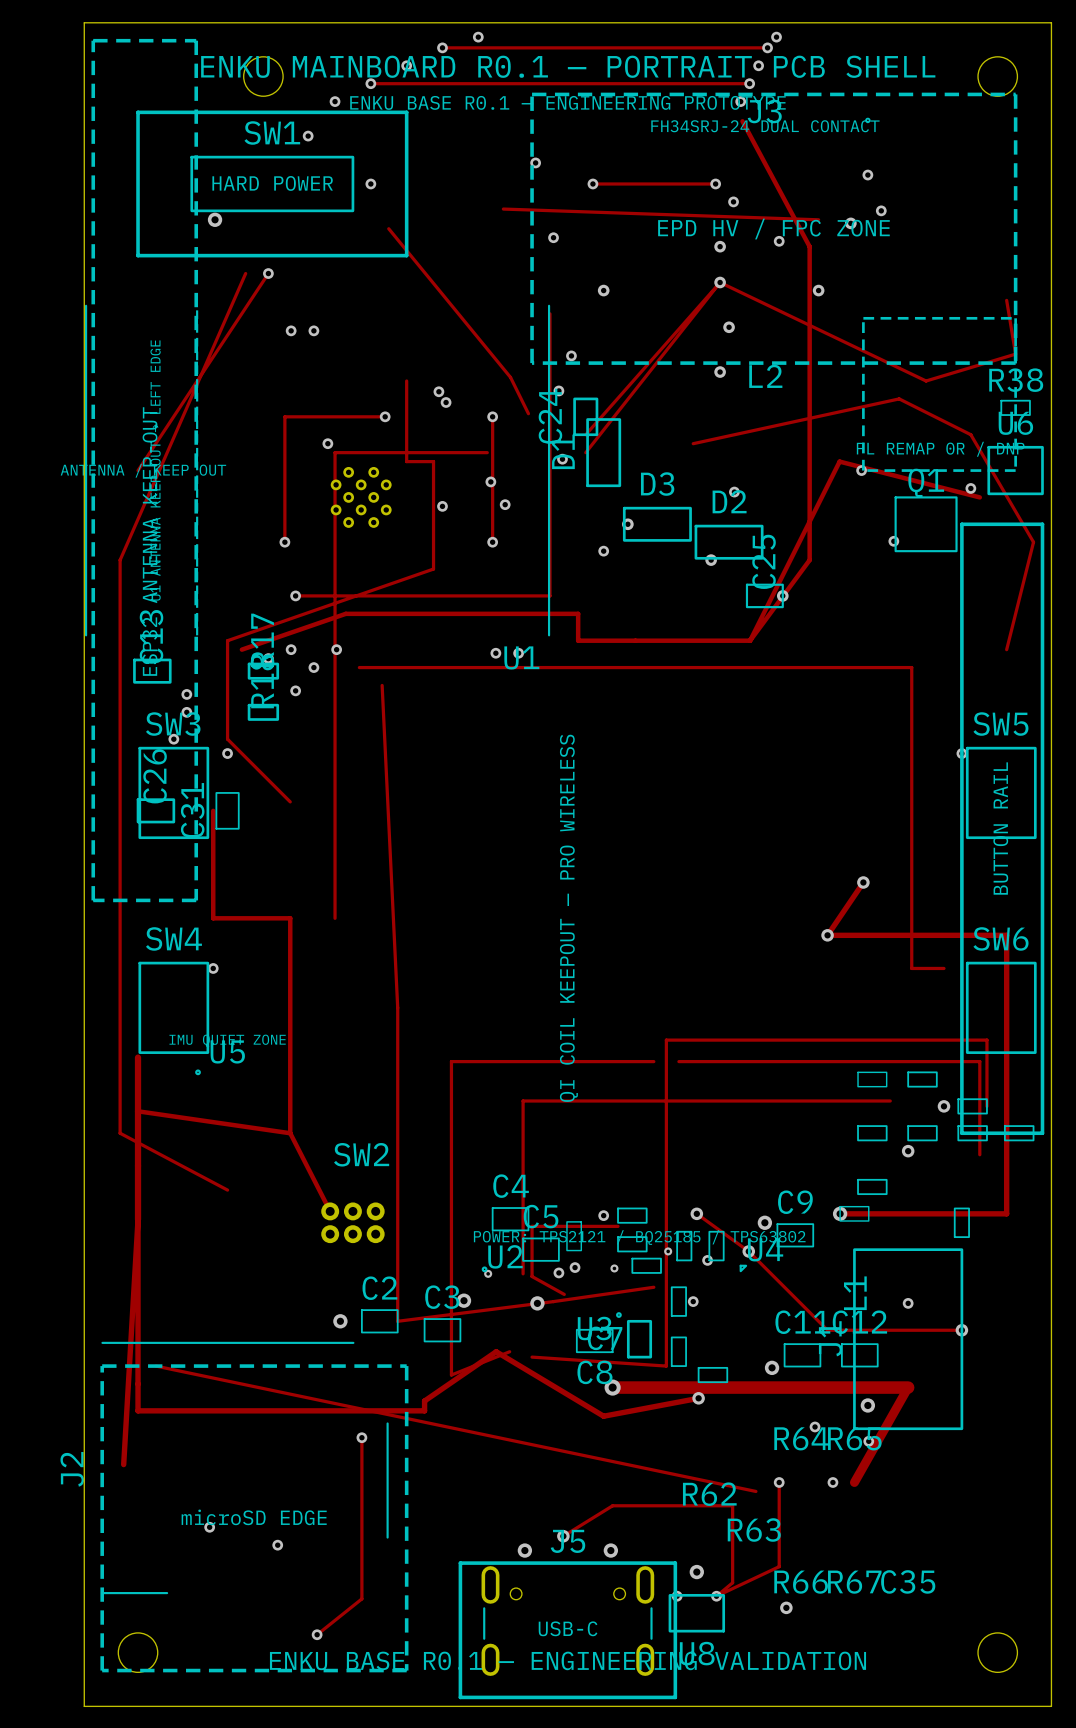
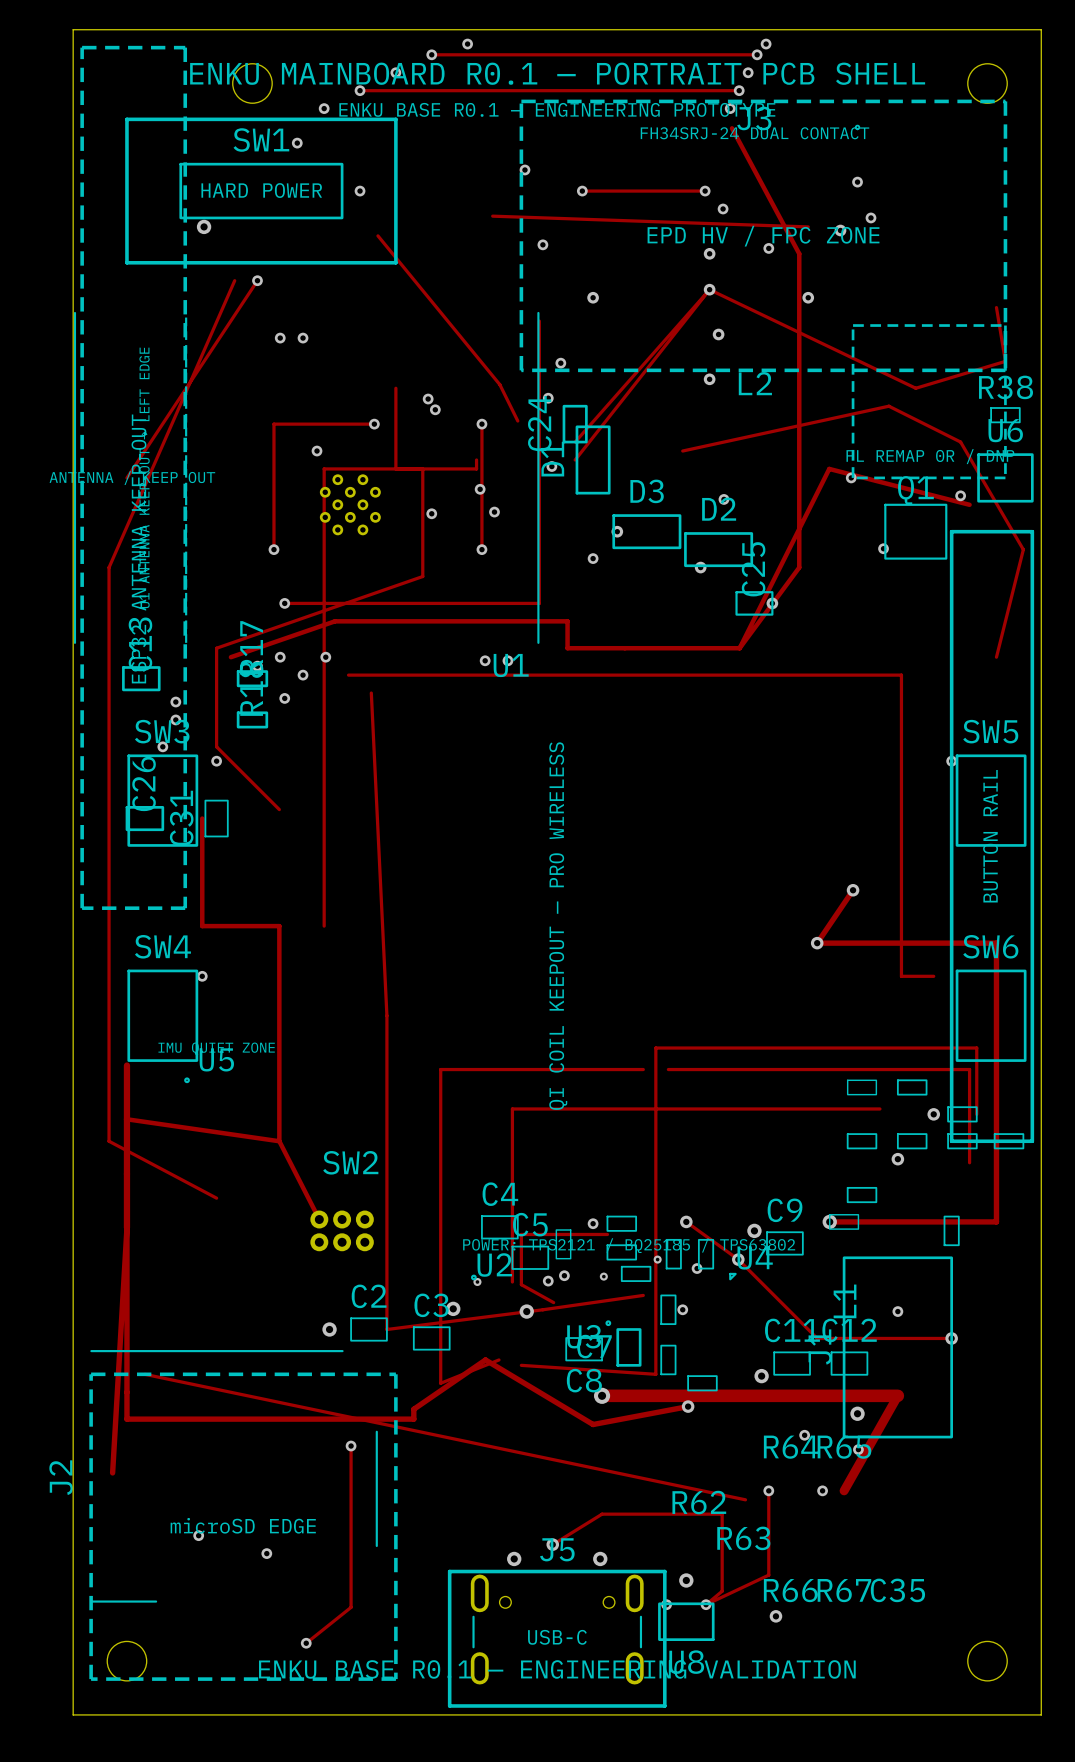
track: (487, 452) (335, 452) (335, 461) -> (395, 468) (324, 468)
track: none -> (476, 459) (476, 468) (422, 468)

